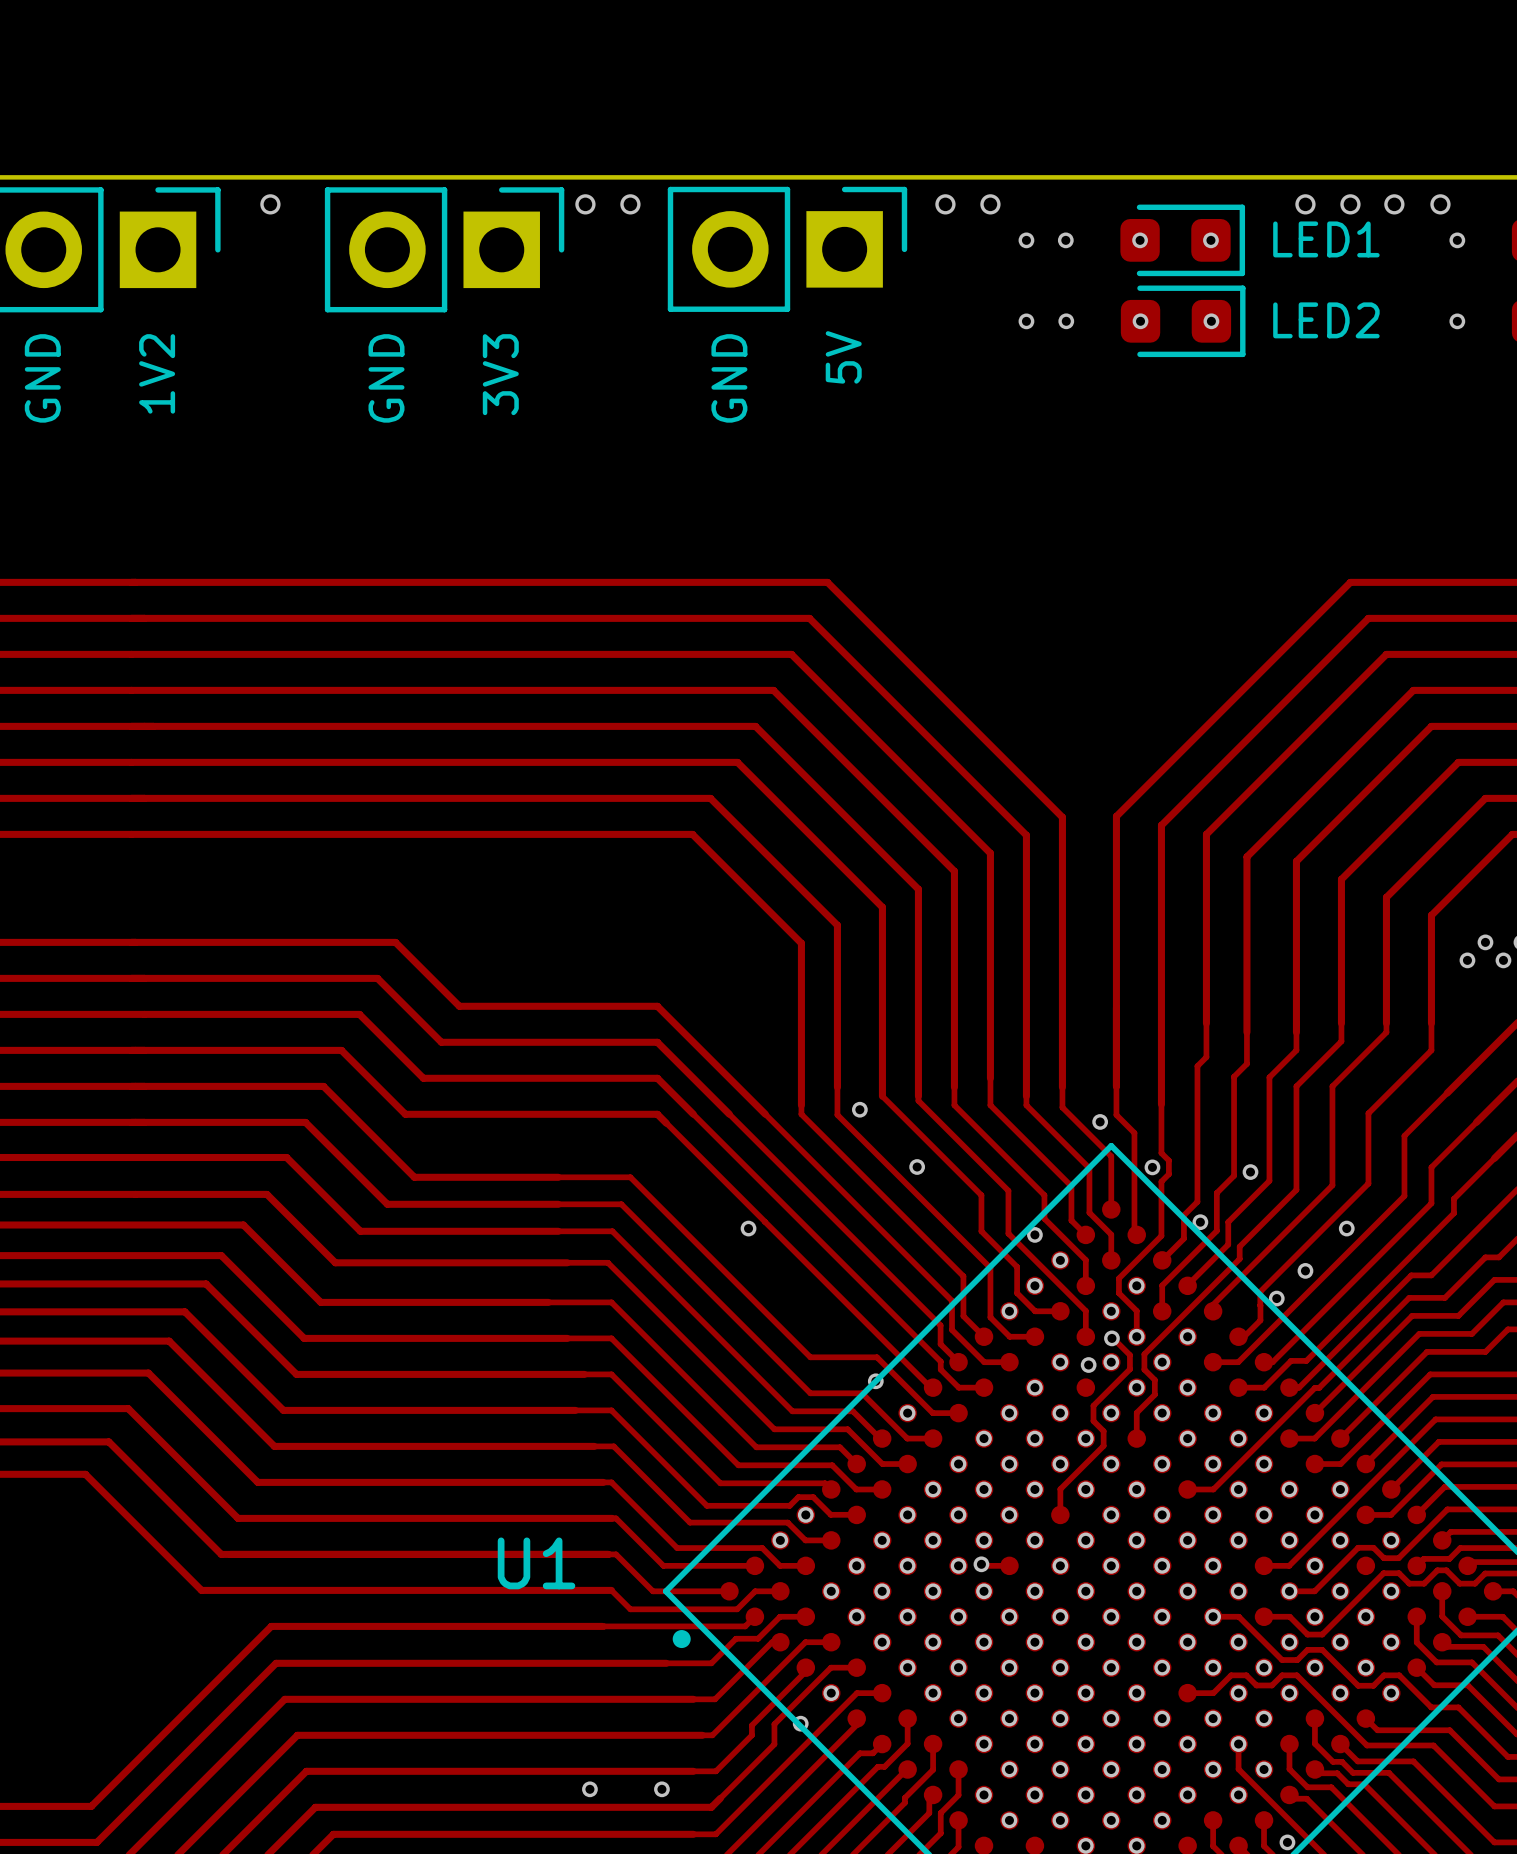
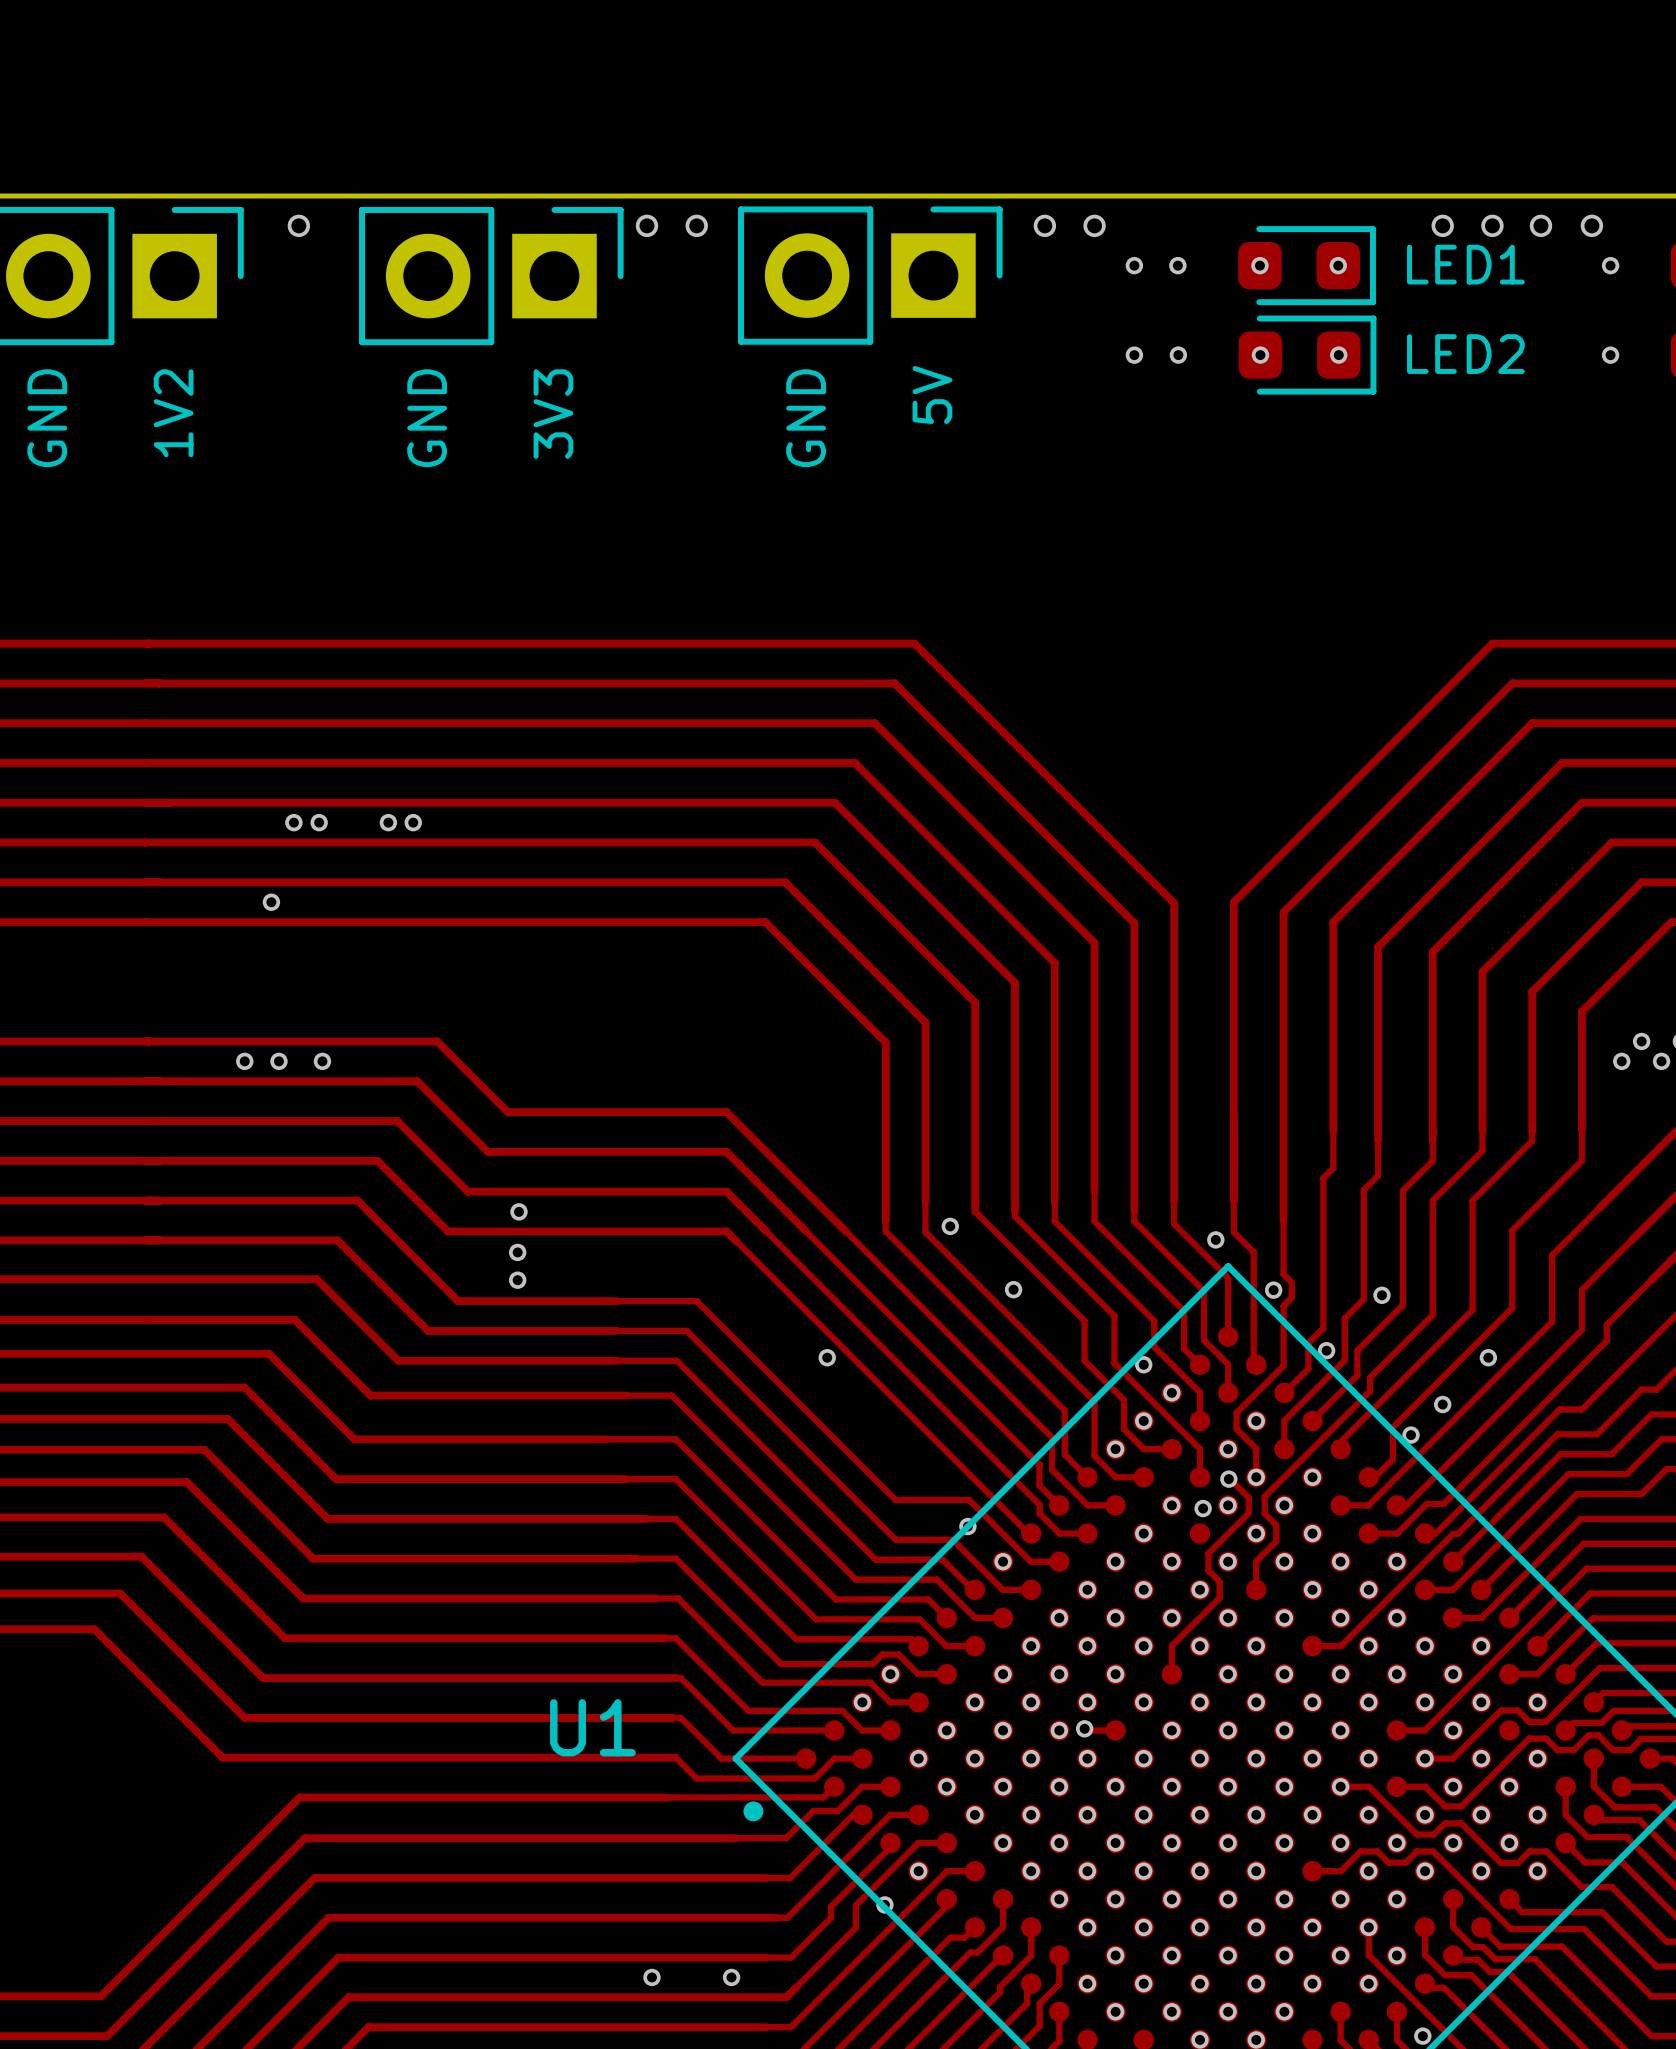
via: none -> (293, 822)
via: none -> (319, 822)
via: none -> (388, 822)
via: none -> (413, 822)
via: none -> (271, 902)
via: none -> (244, 1061)
via: none -> (278, 1061)
via: none -> (322, 1061)
via: none -> (518, 1211)
via: none -> (517, 1252)
via: none -> (517, 1280)

